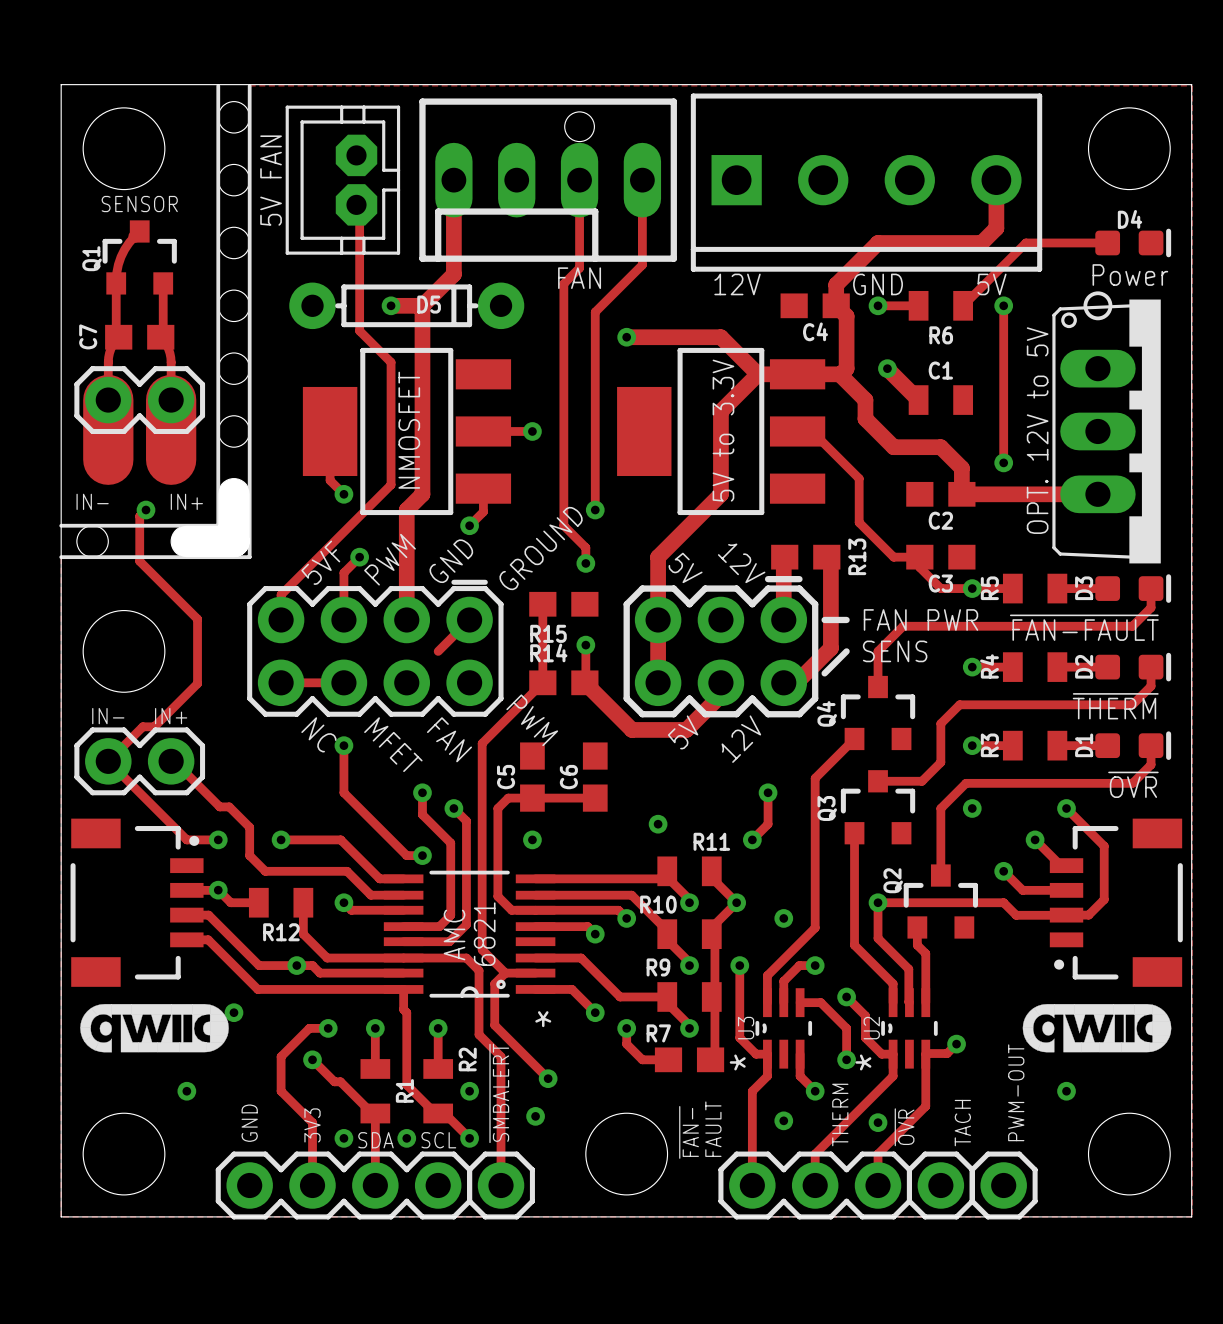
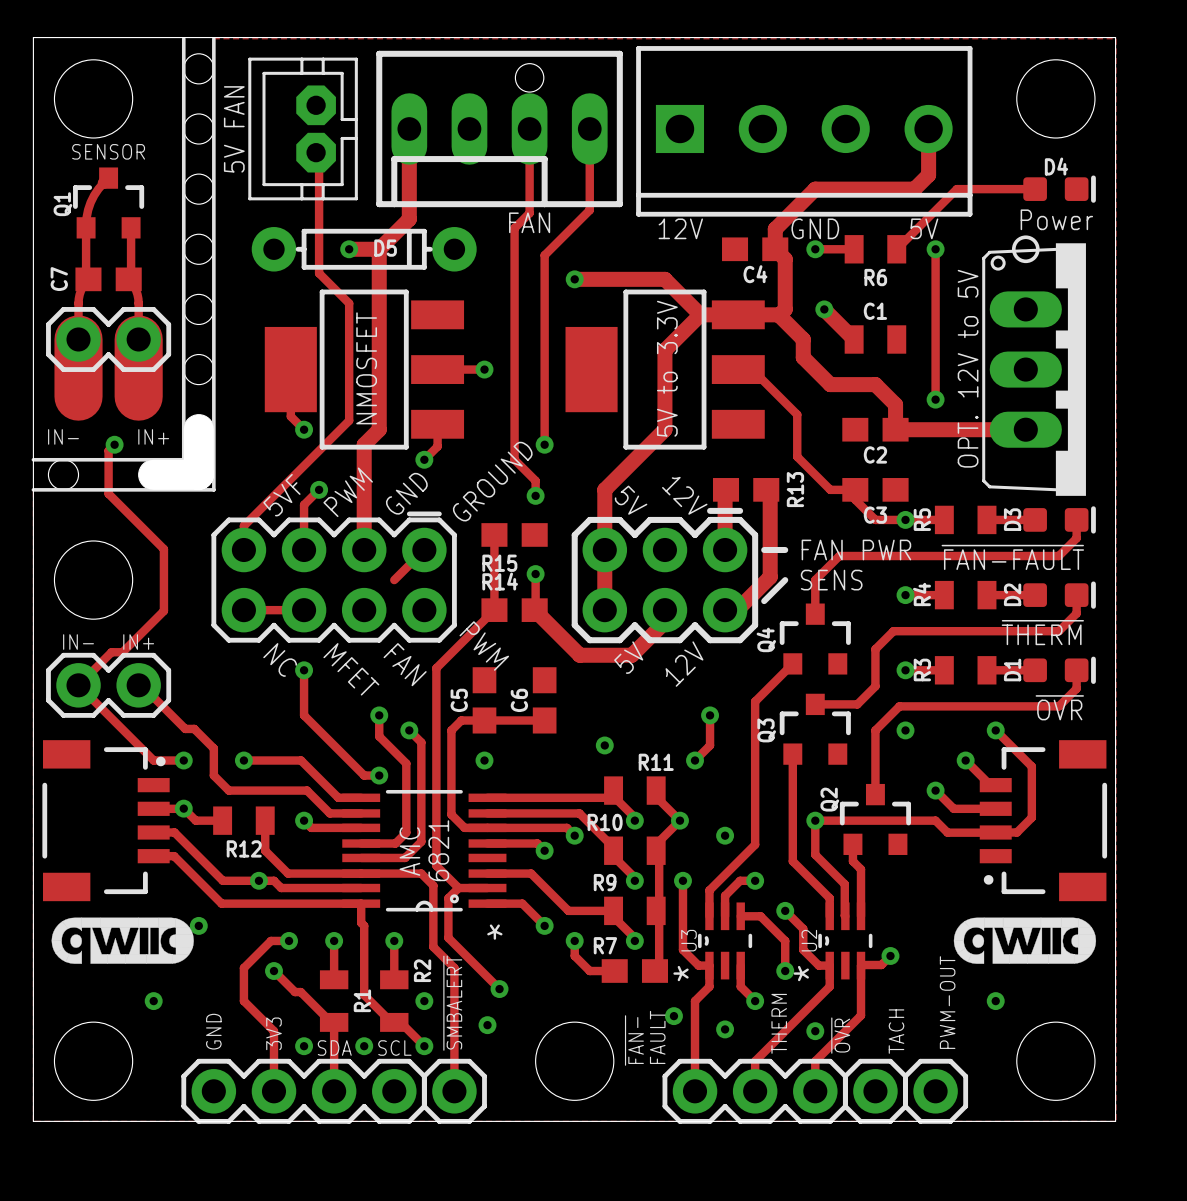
via: none -> (673, 1016)

